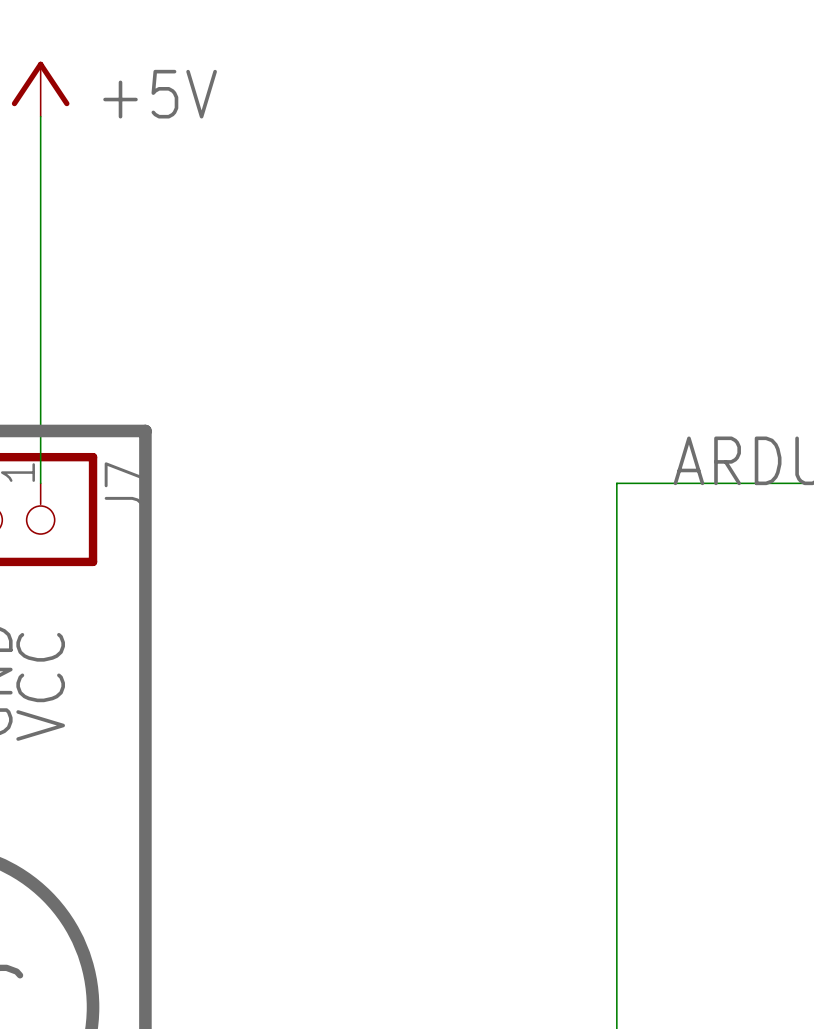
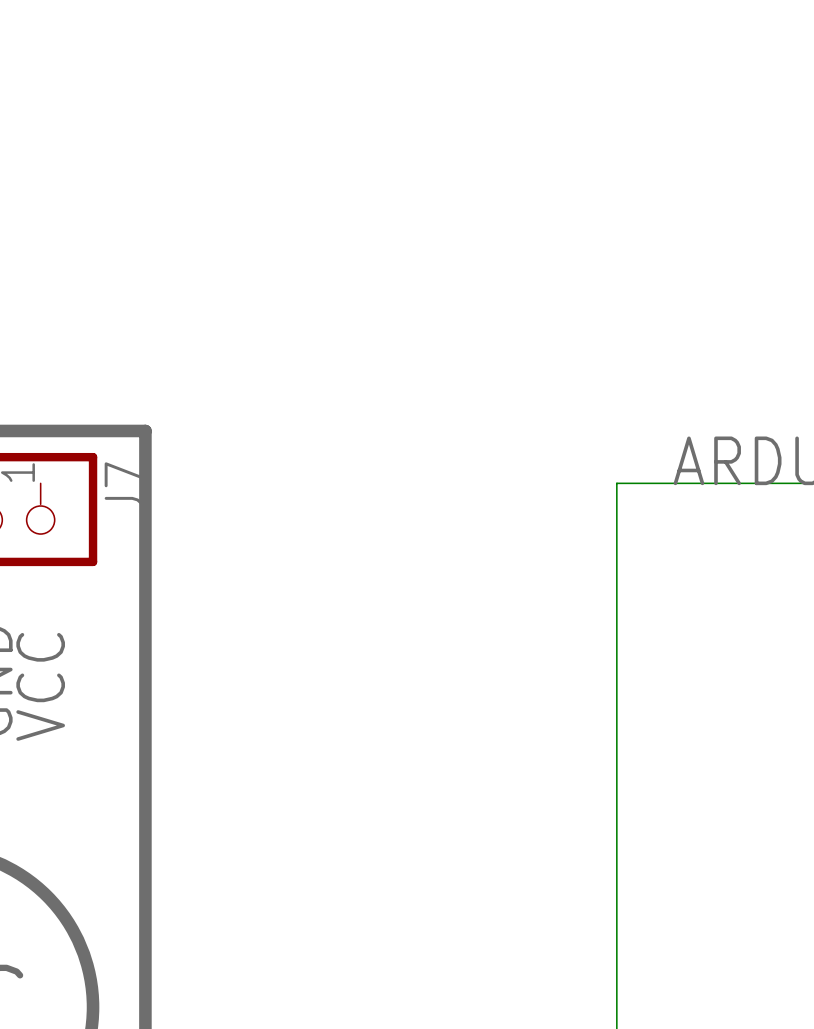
power symbol: (40, 89) -> none
label: +5V (160, 94) -> none
wire: (40, 116) (40, 483) -> none

